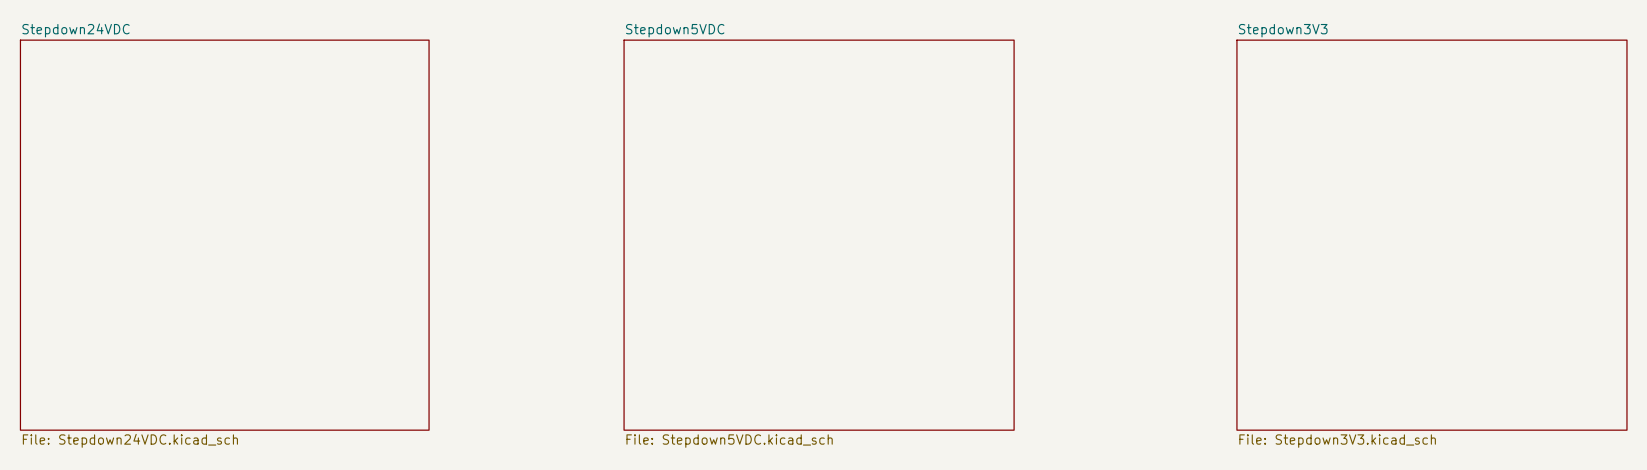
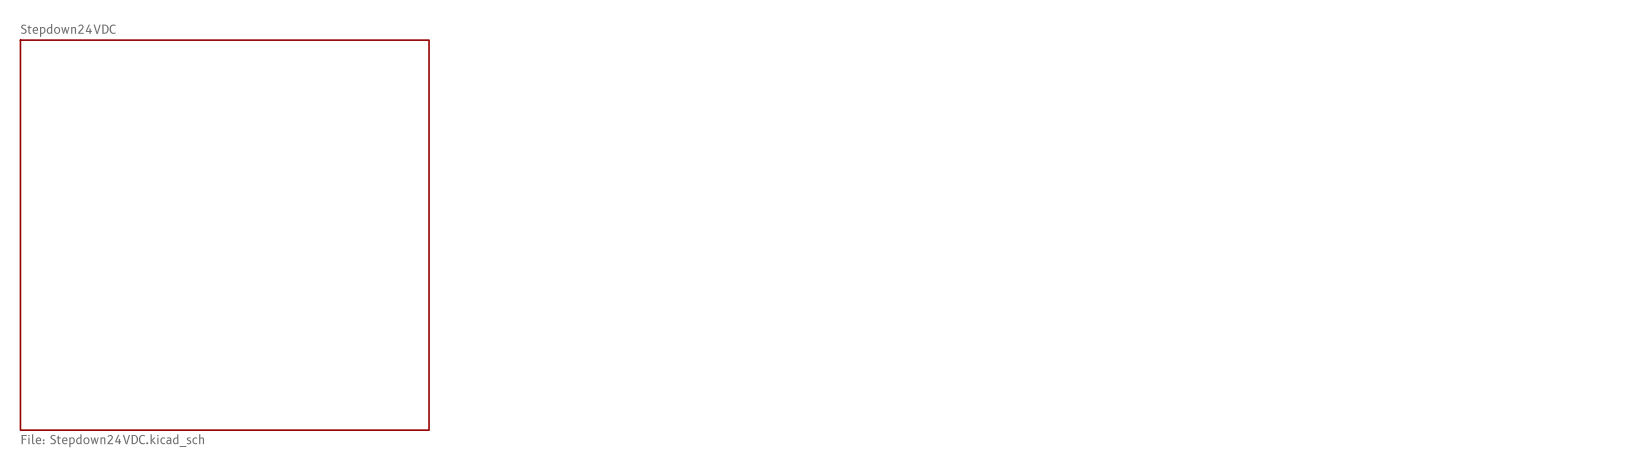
sheet Stepdown5VDC: File: Stepdown5VDC.kicad_sch (819, 235) -> none
sheet Stepdown3V3: File: Stepdown3V3.kicad_sch (1431, 235) -> none

